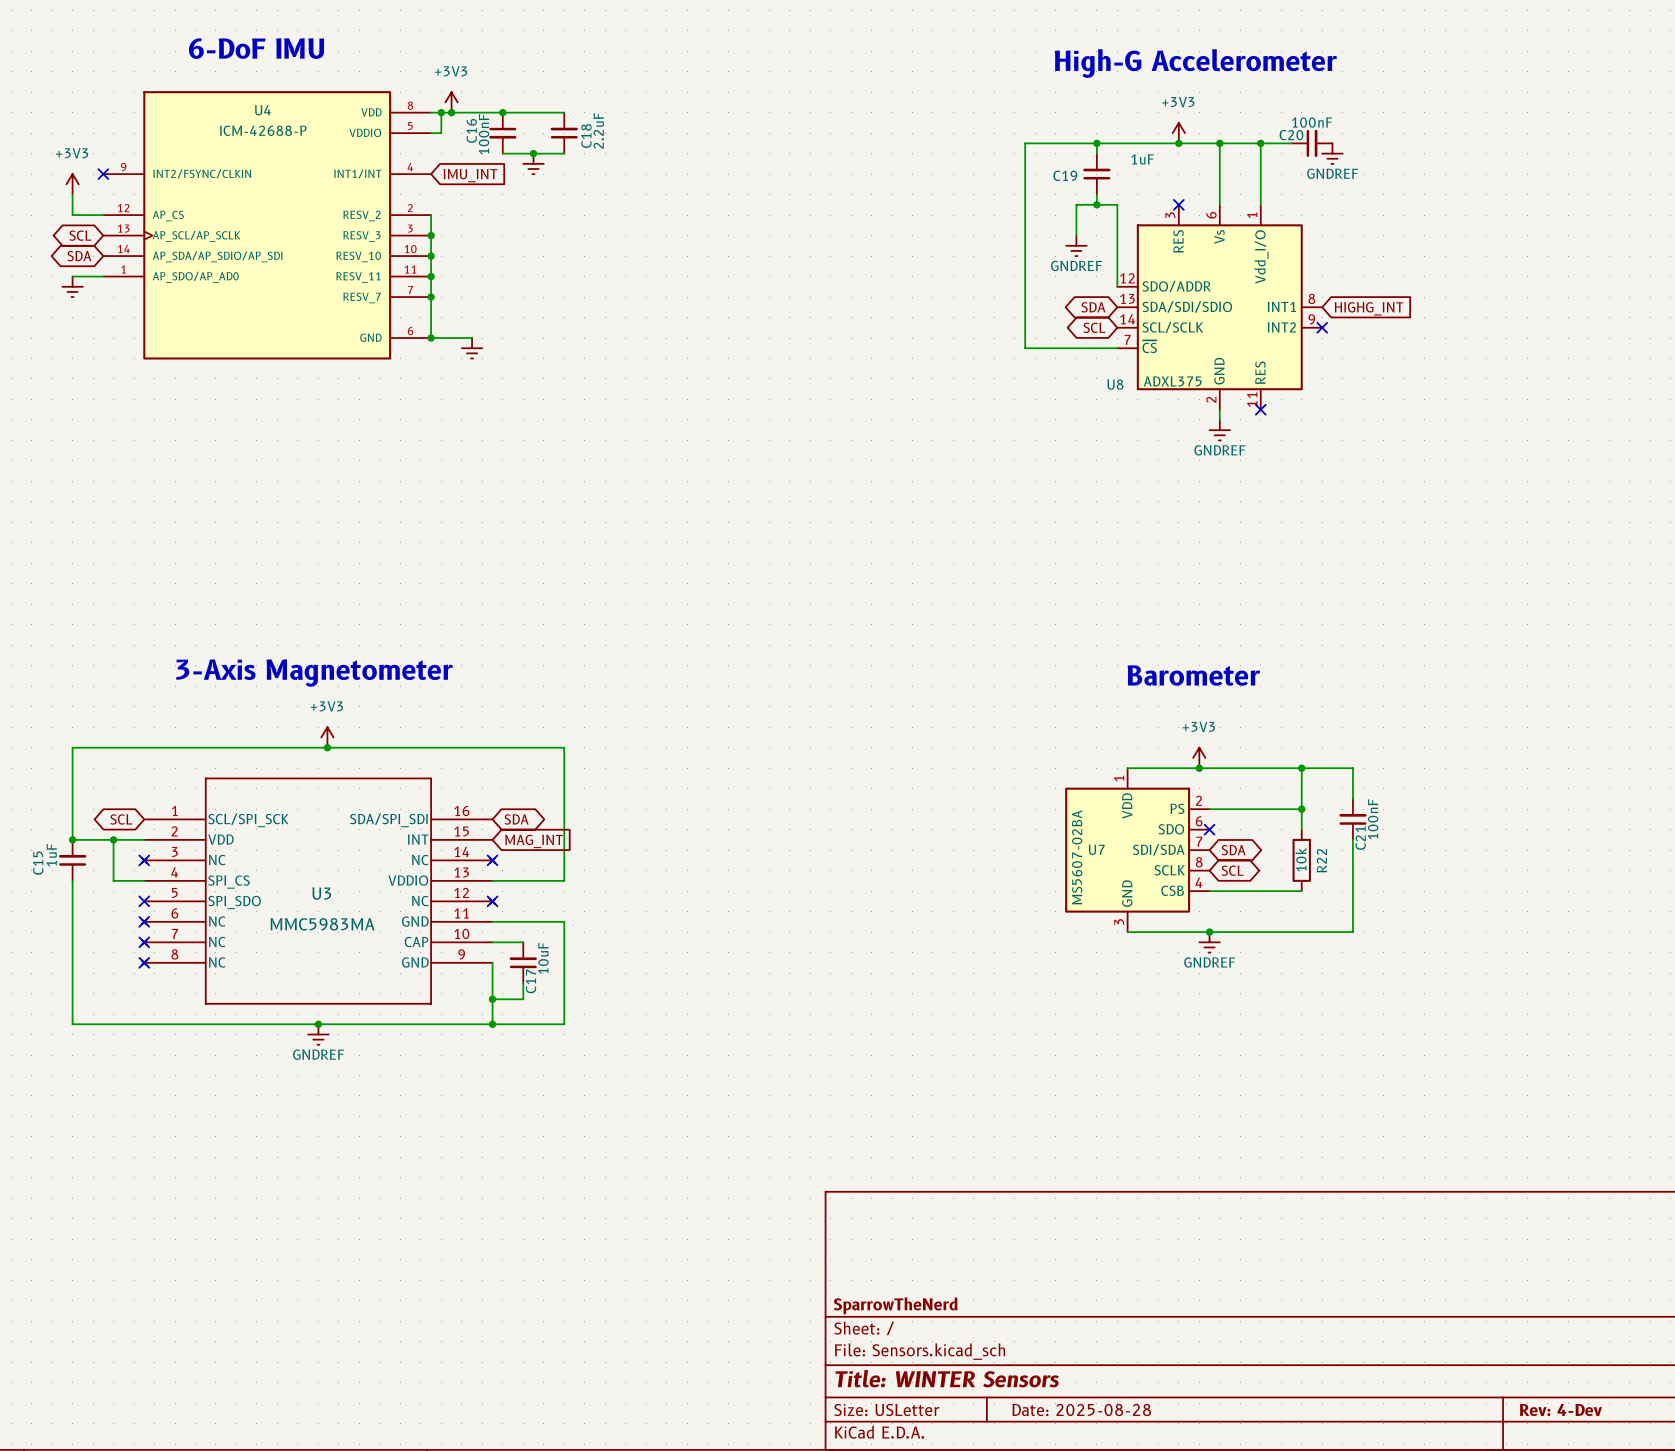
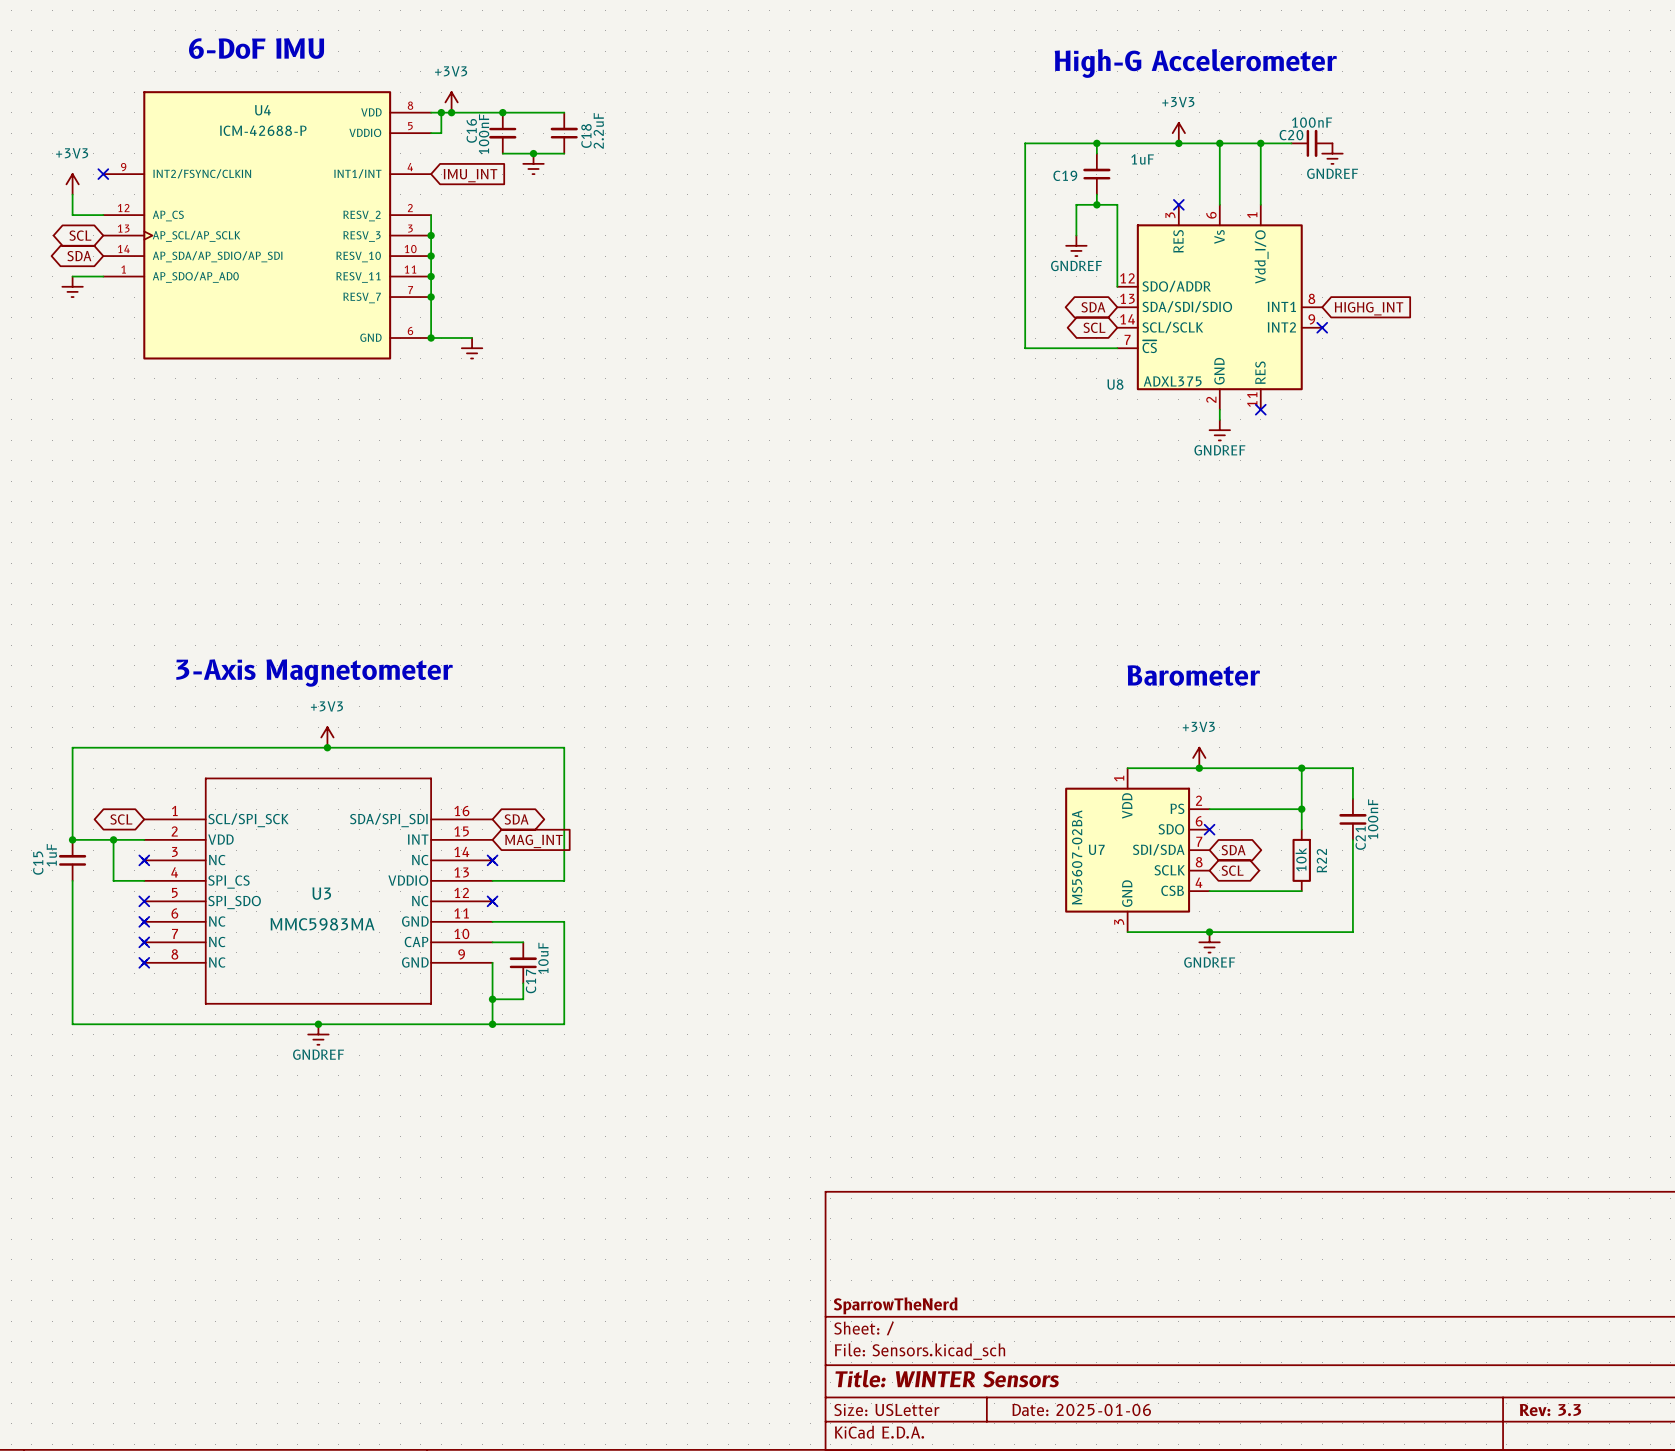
title block: Date: 2025-08-28 (1081, 1409) -> Date: 2025-01-06 (1081, 1409)
title block: Rev: 4-Dev (1560, 1410) -> Rev: 3.3 (1550, 1410)

